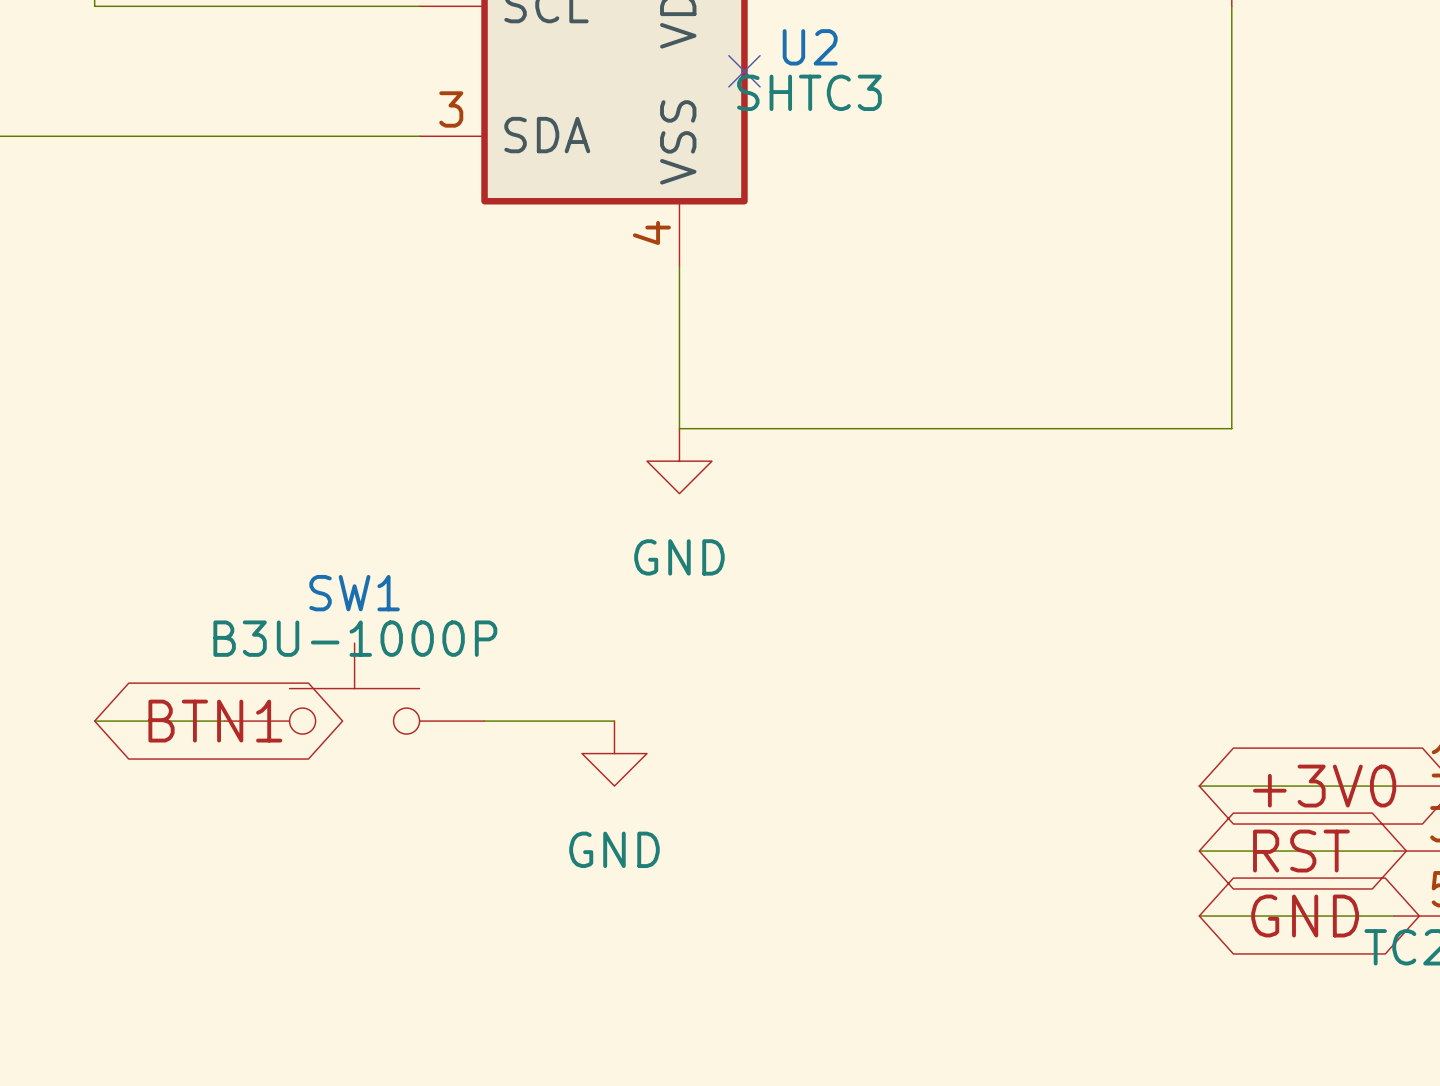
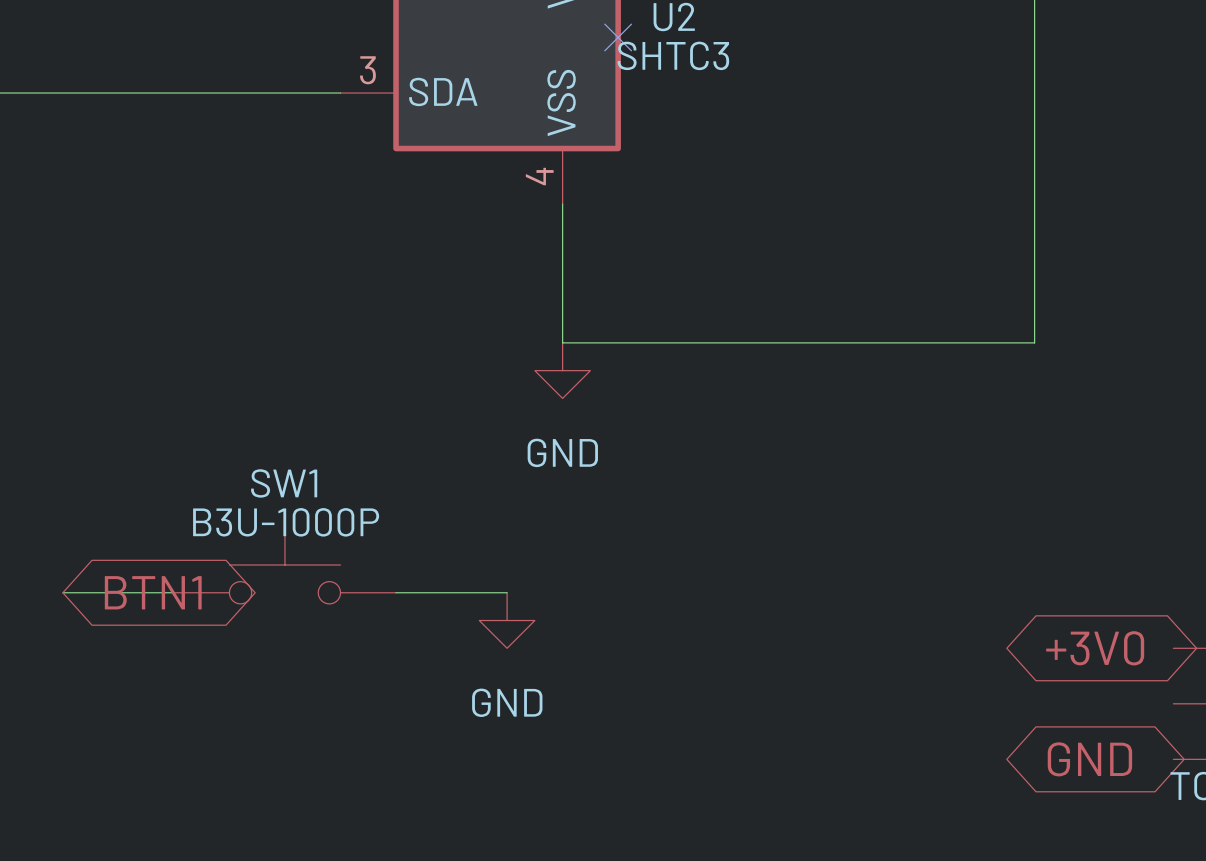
wire: (1199, 786) (1394, 786) -> none
wire: (1199, 851) (1394, 851) -> none
global label: RST (1301, 851) -> none
wire: (1199, 916) (1394, 916) -> none

